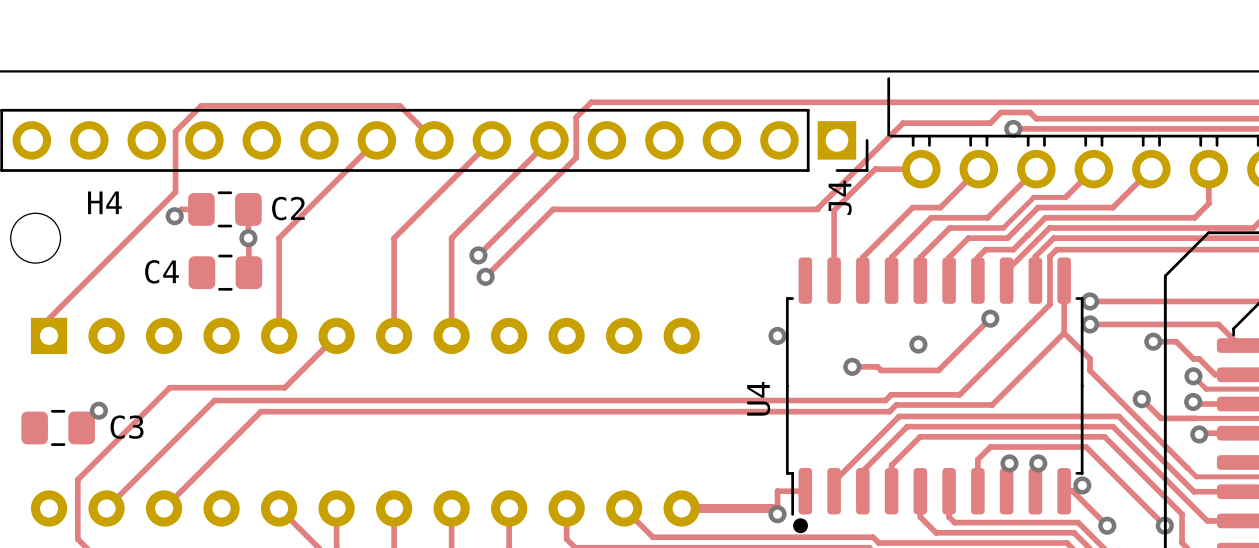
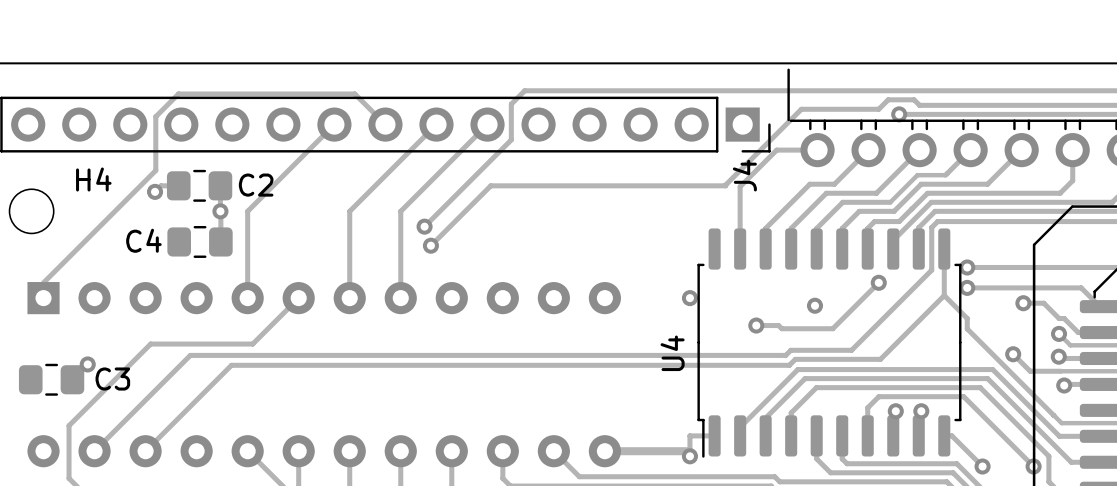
via: (1082, 485) -> none
drawing: [793, 518, 808, 534] -> none

